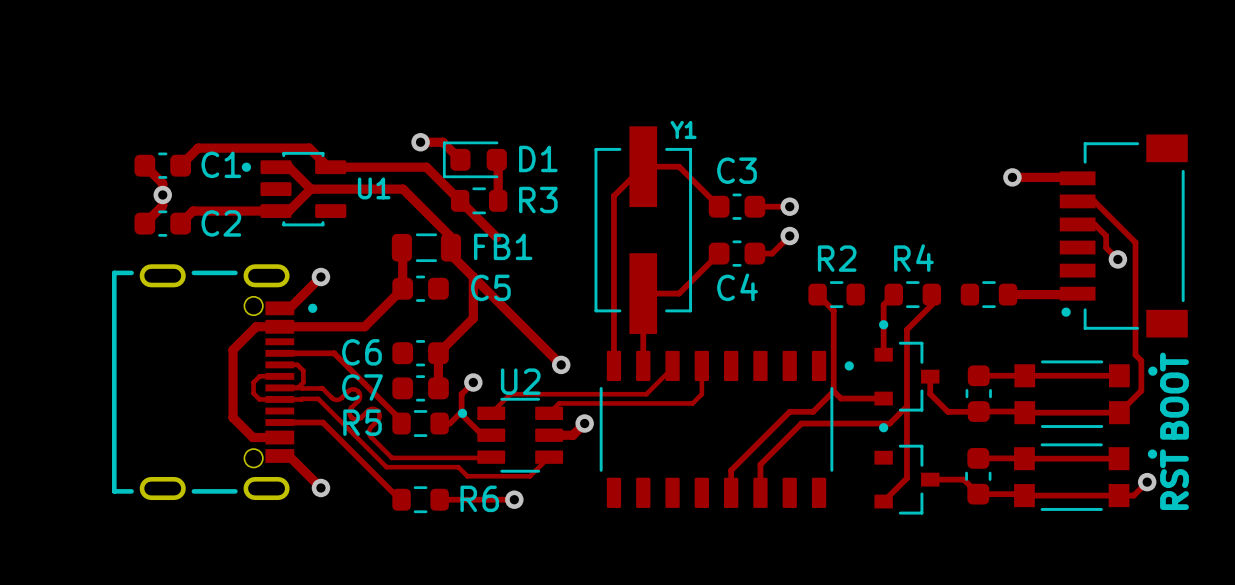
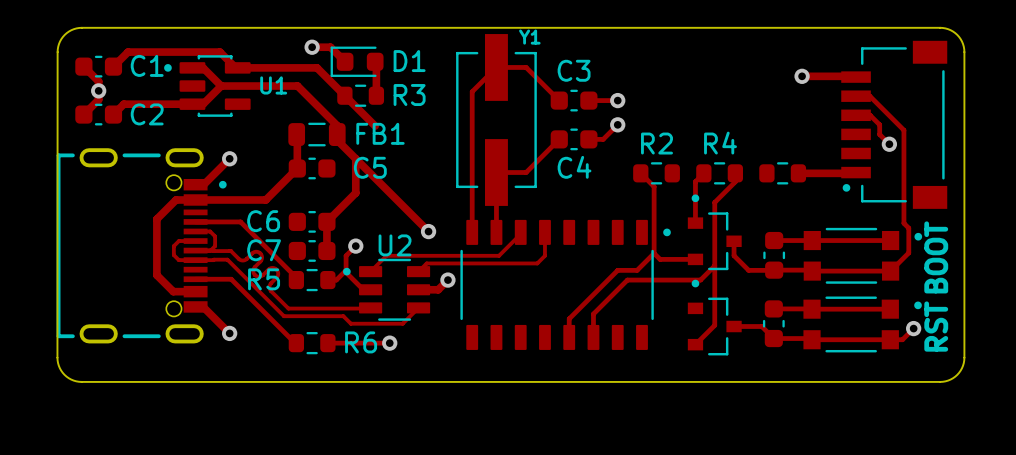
board edge: none -> (81, 27) (948, 29) (959, 36) (964, 52) (963, 365) (955, 376) (940, 381) (73, 380) (61, 370) (57, 357) (57, 52) (60, 41) (64, 34) (73, 29) (81, 27)

